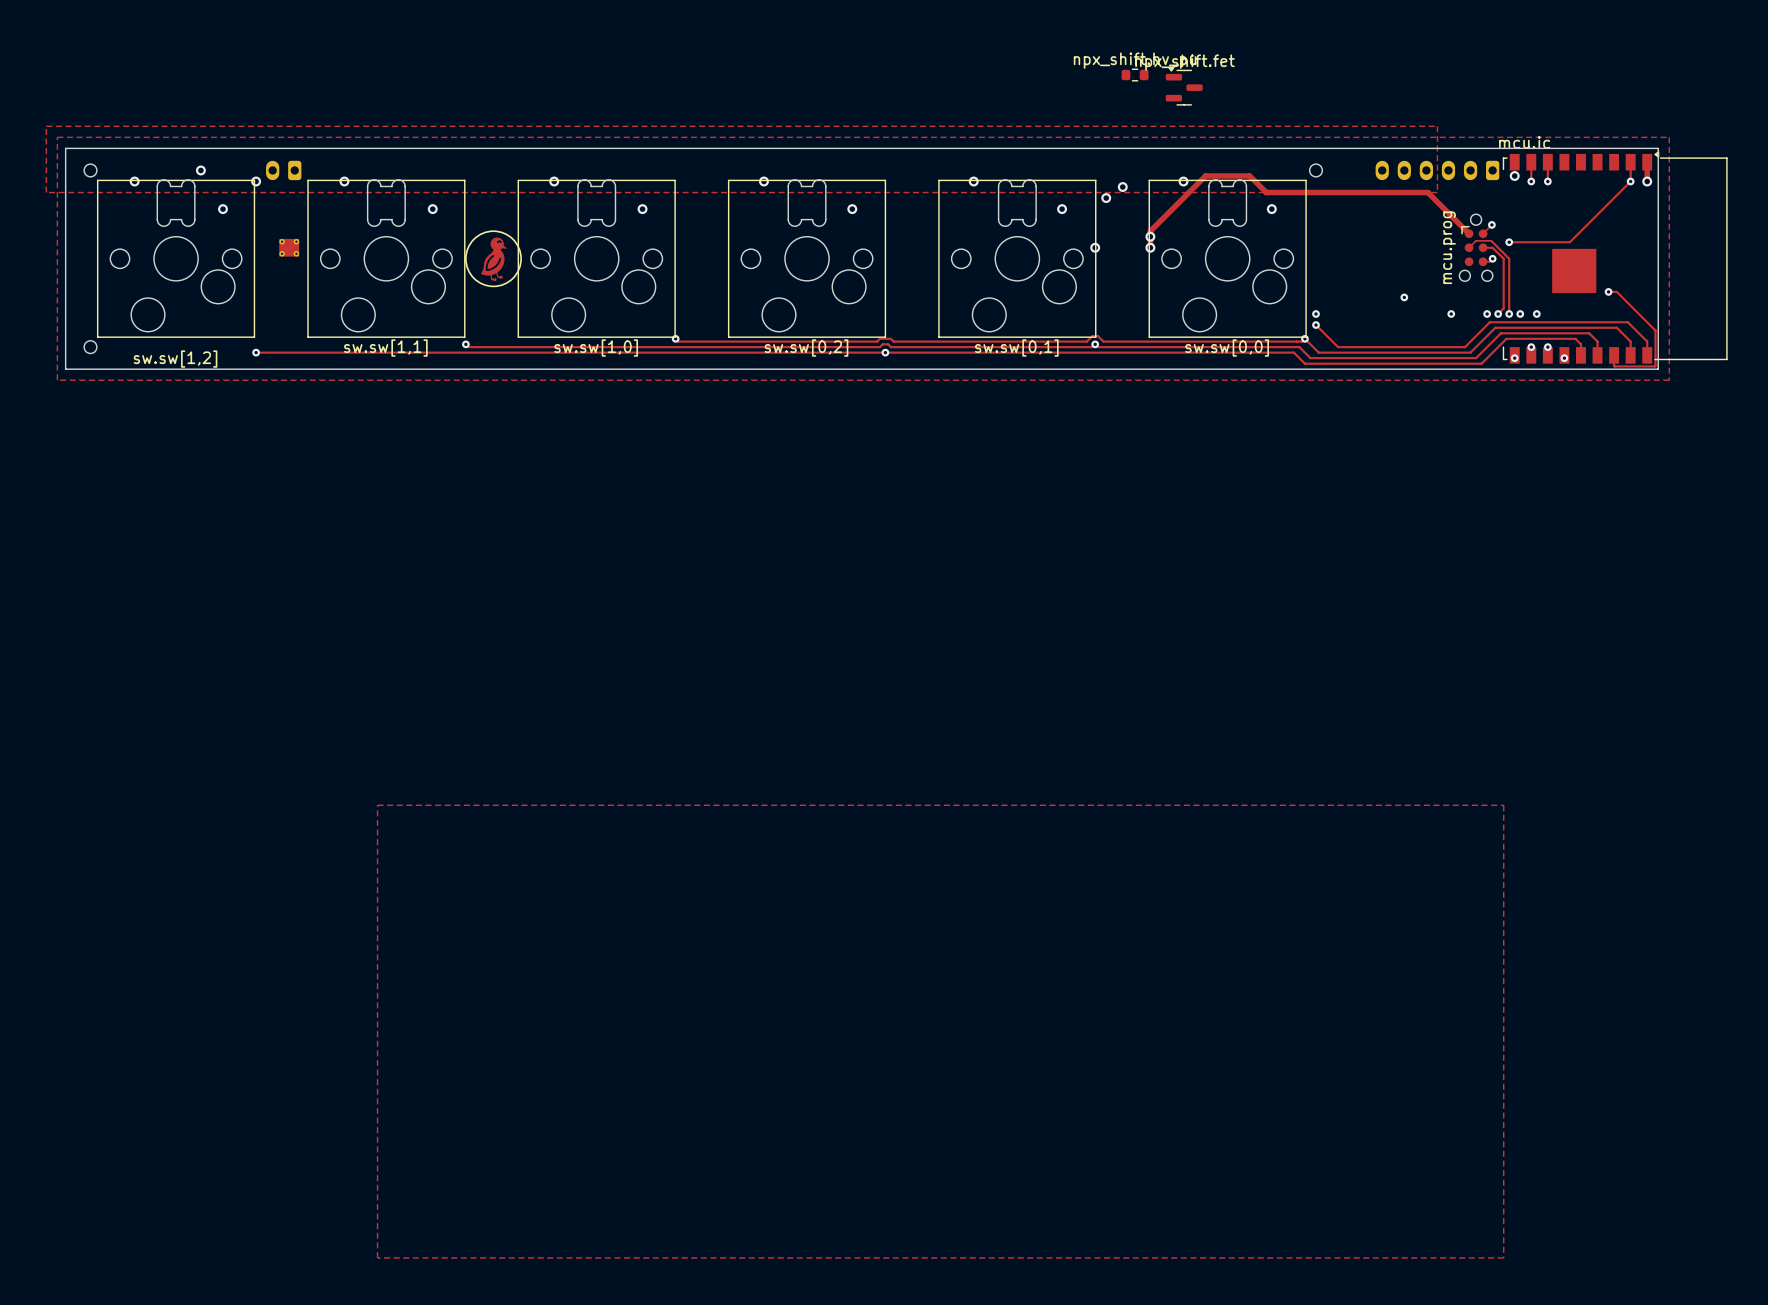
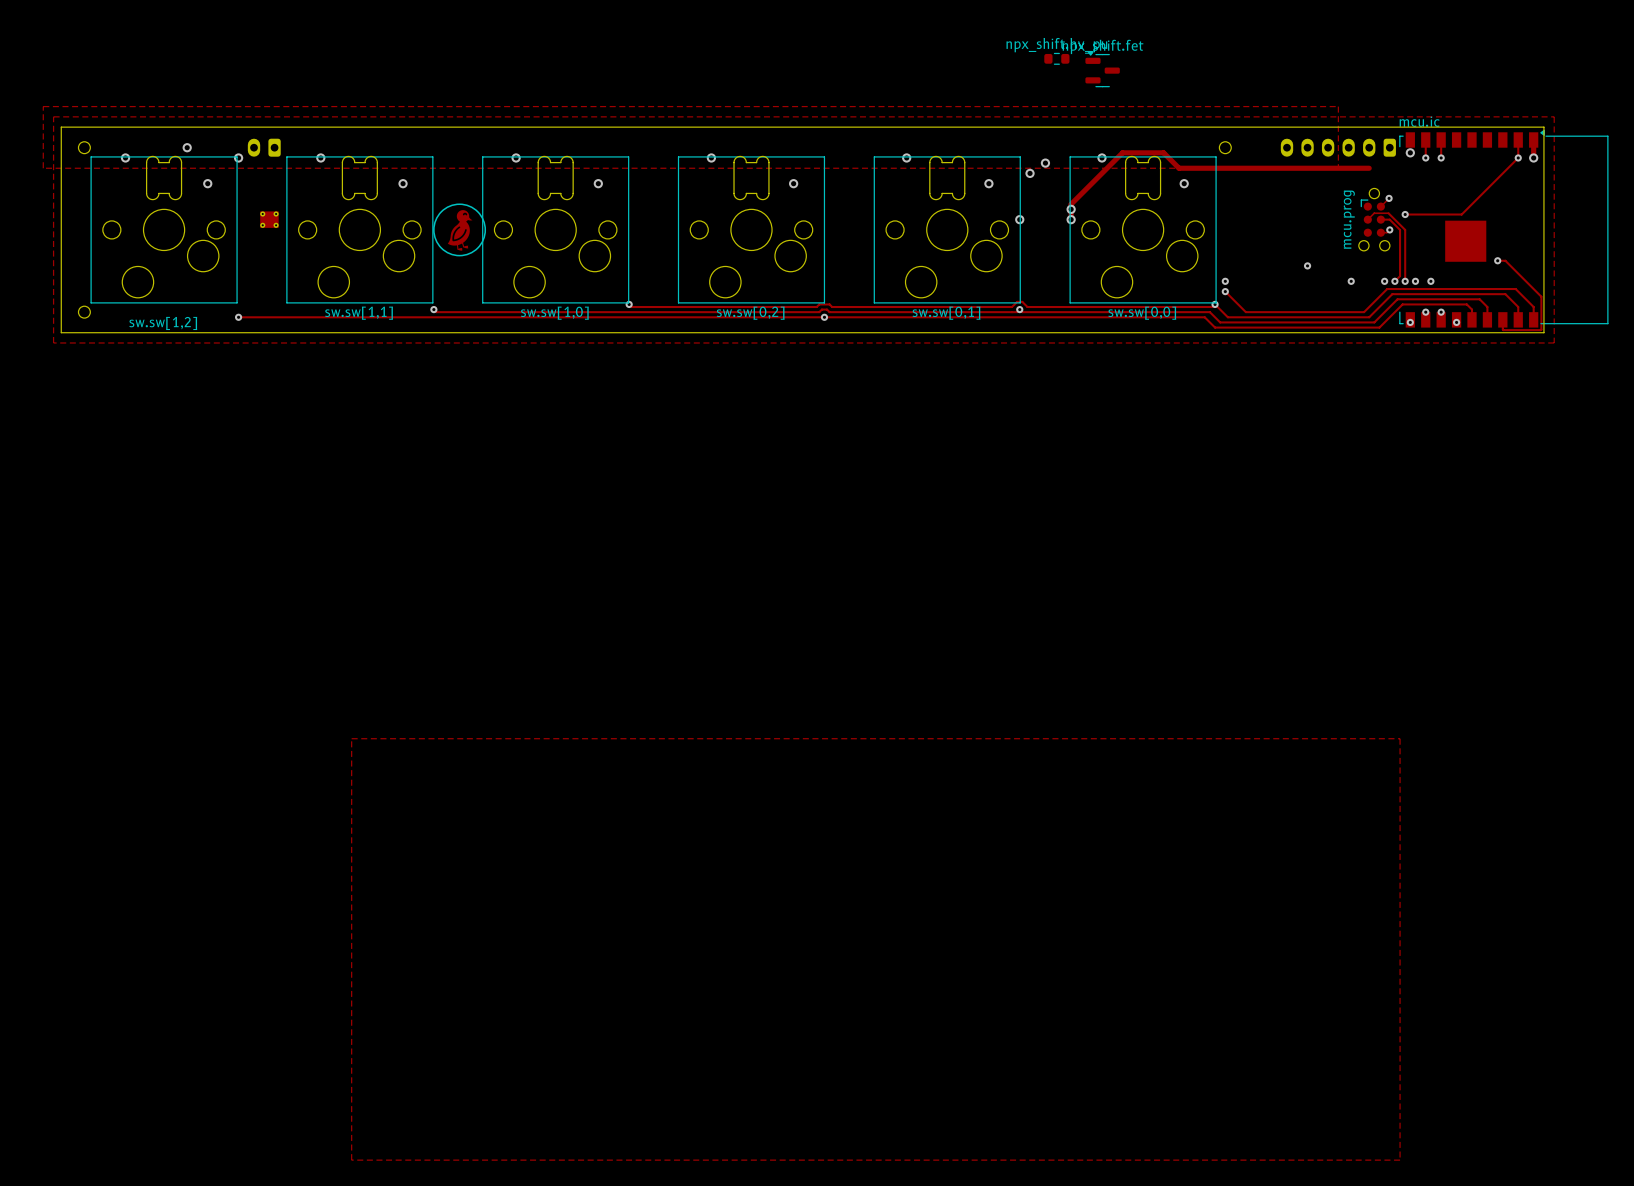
track: (1427, 192) (1469, 233) -> (1329, 168) (1369, 168)

